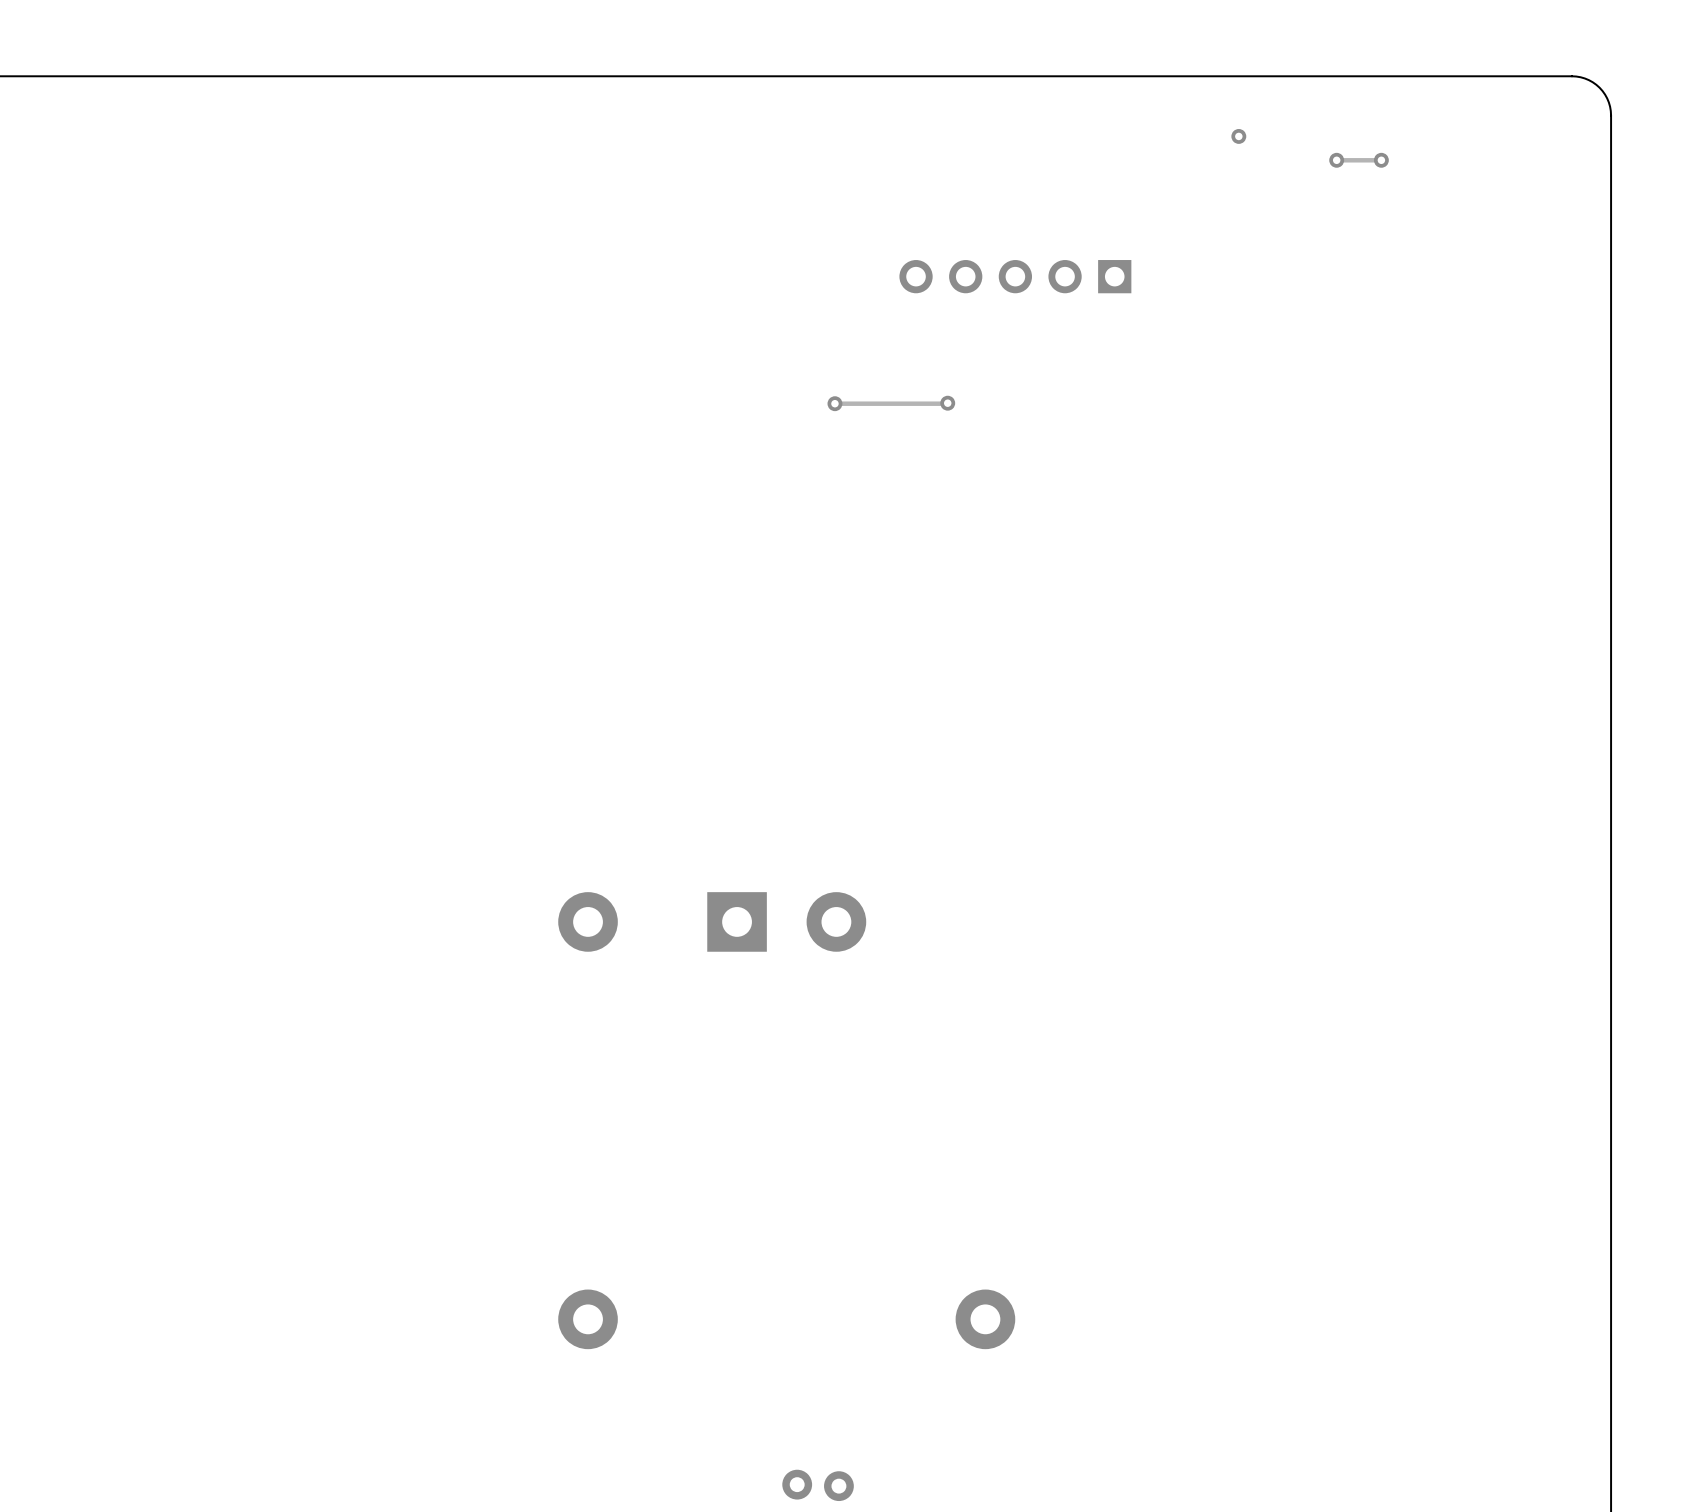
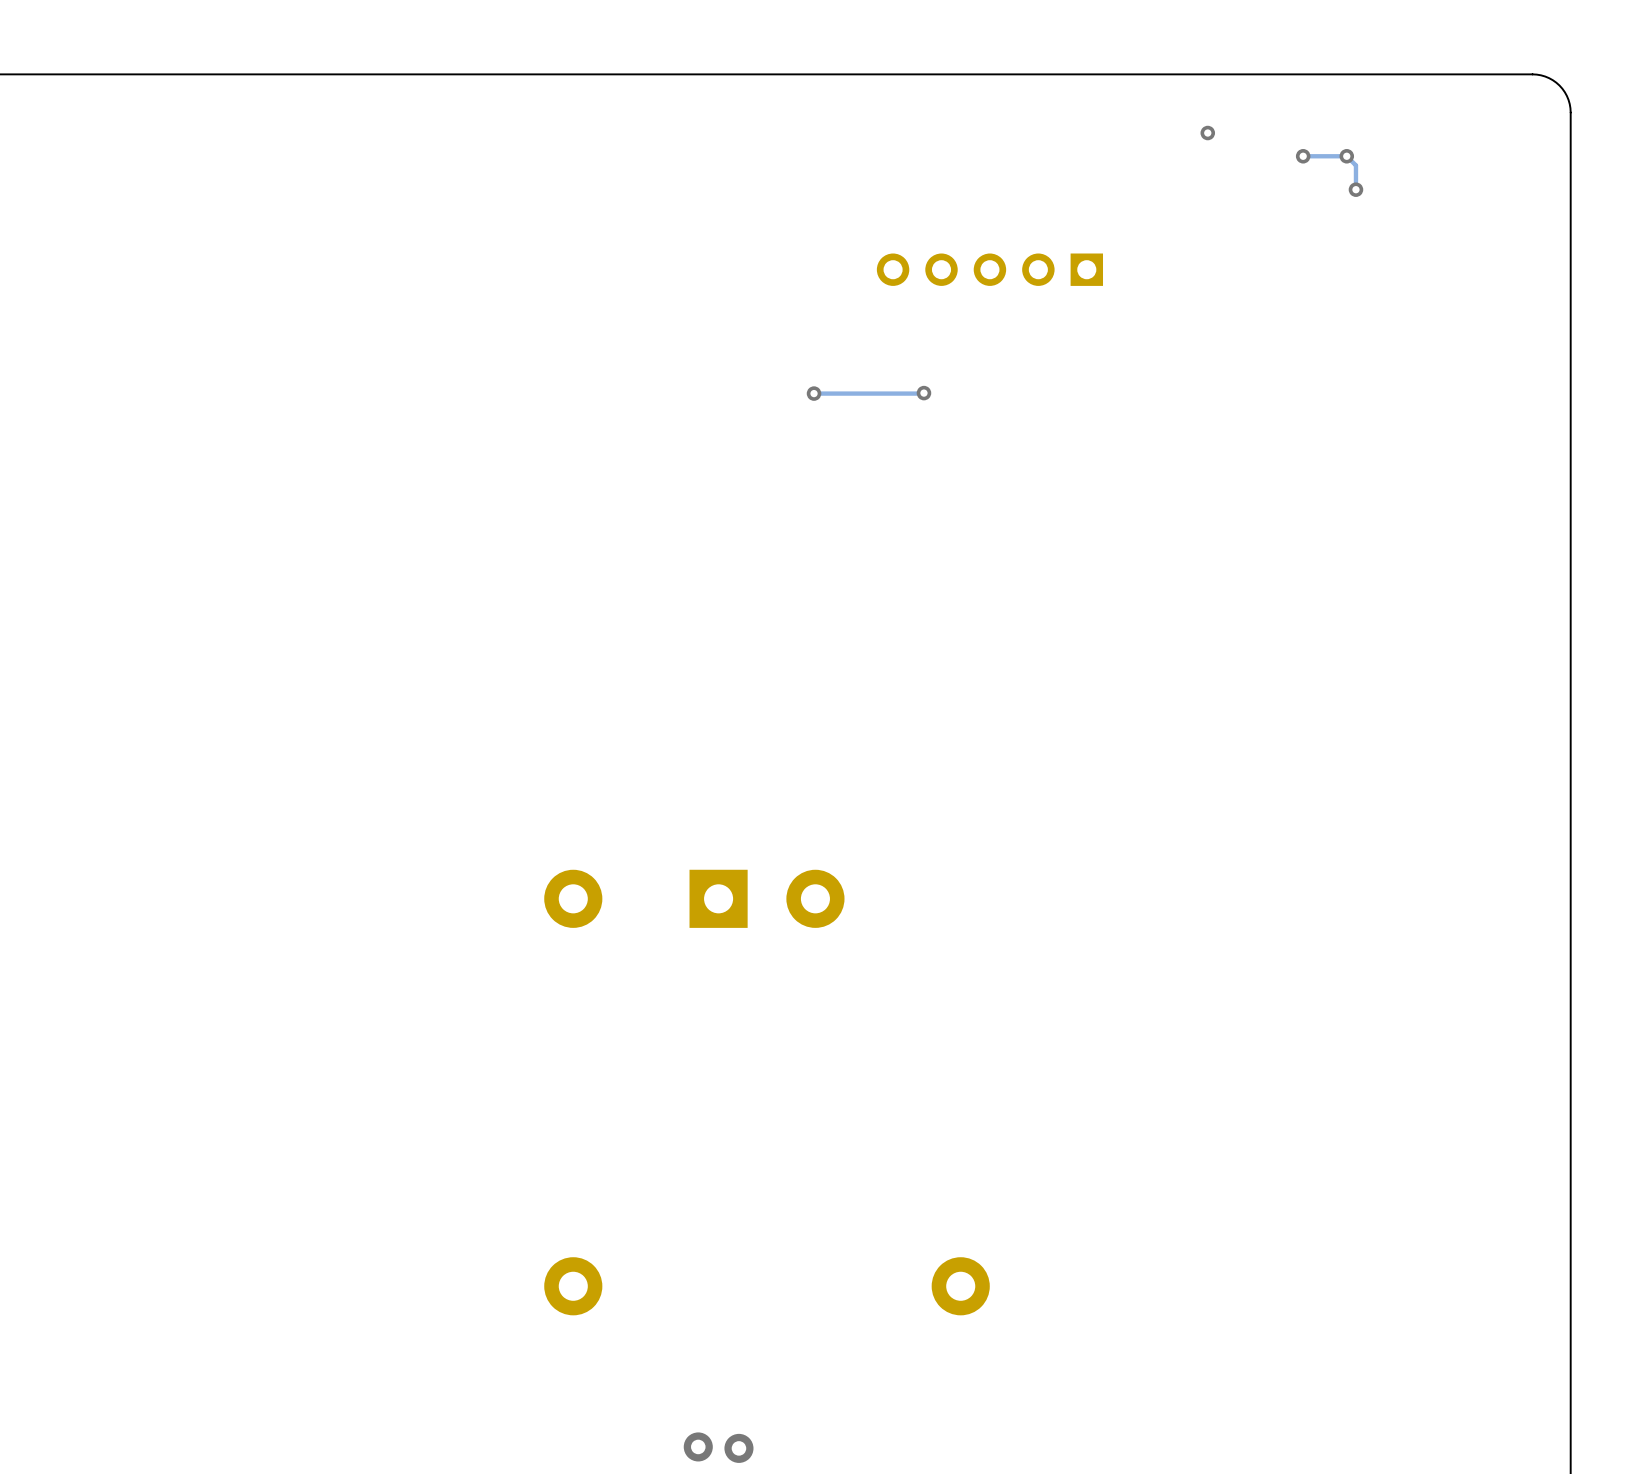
track: none -> (1346, 156) (1355, 165) (1355, 189)
via: none -> (1355, 189)
via: none -> (698, 1446)
via position: (797, 1484) -> (738, 1448)
via: (838, 1486) -> none

